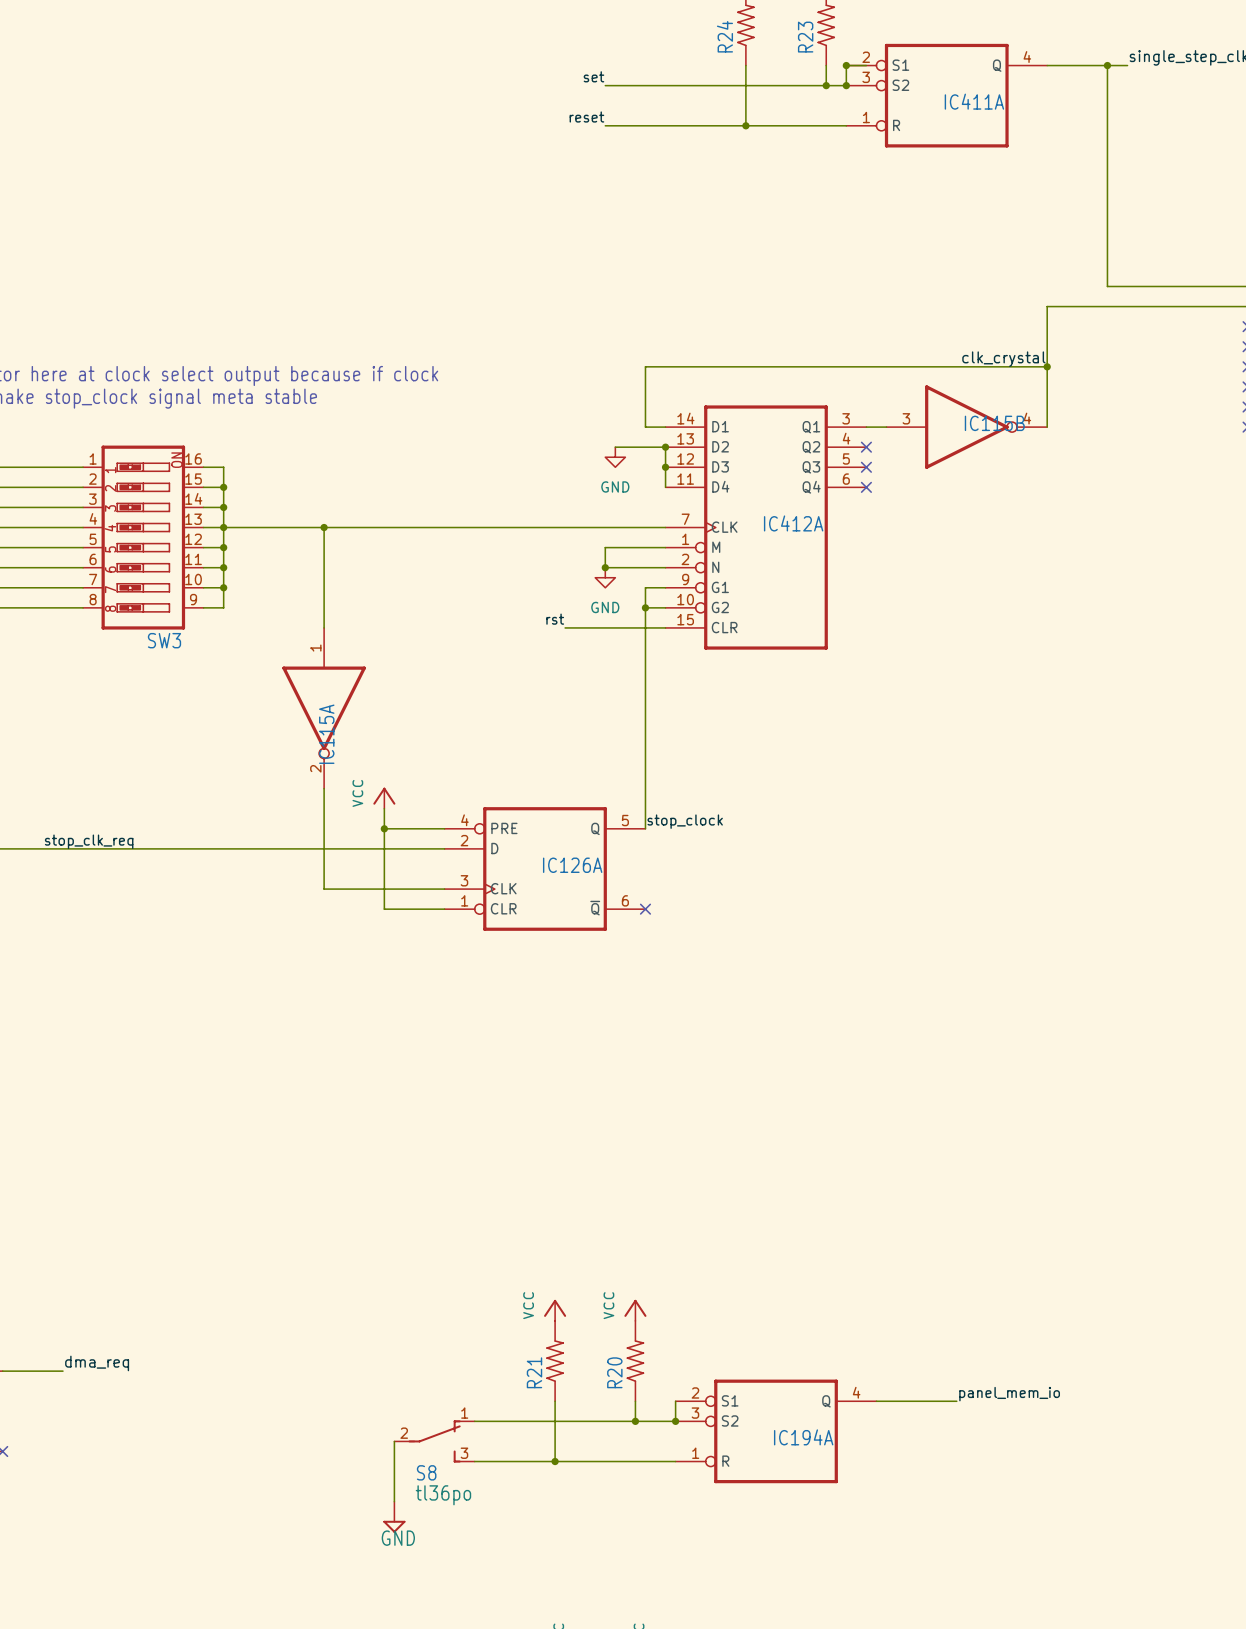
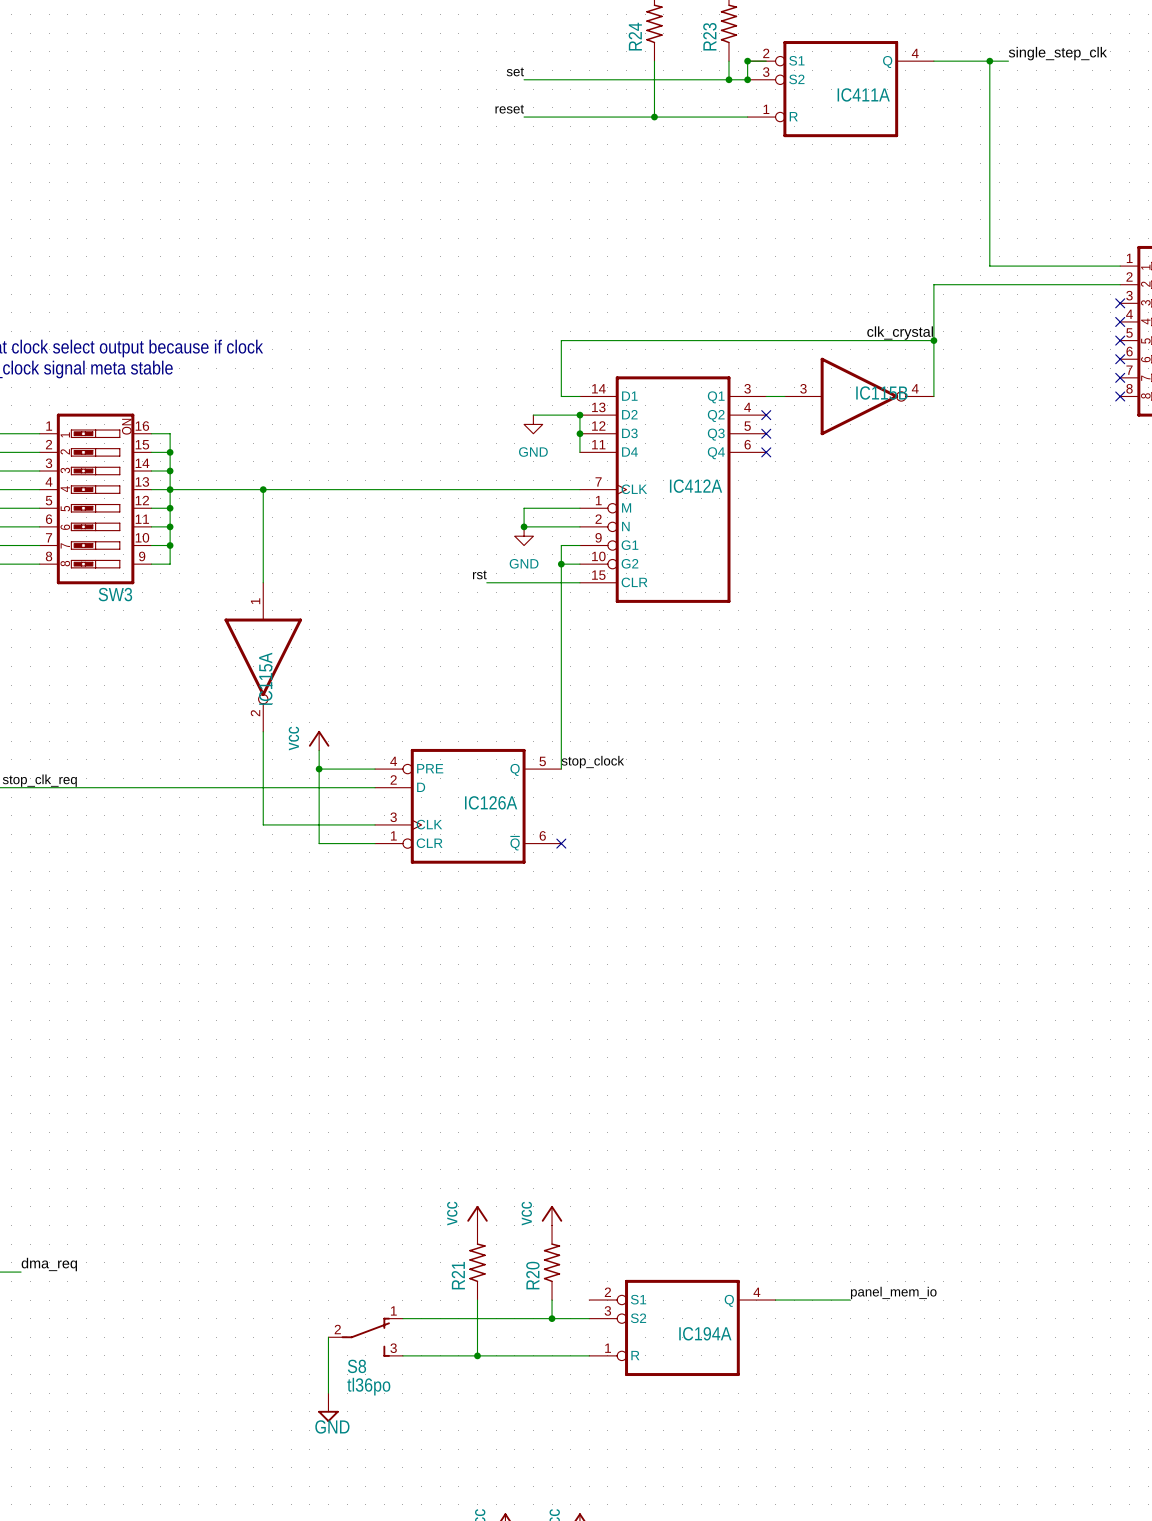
wire: (675, 1401) (675, 1421) -> none
junction: (675, 1421) -> none

